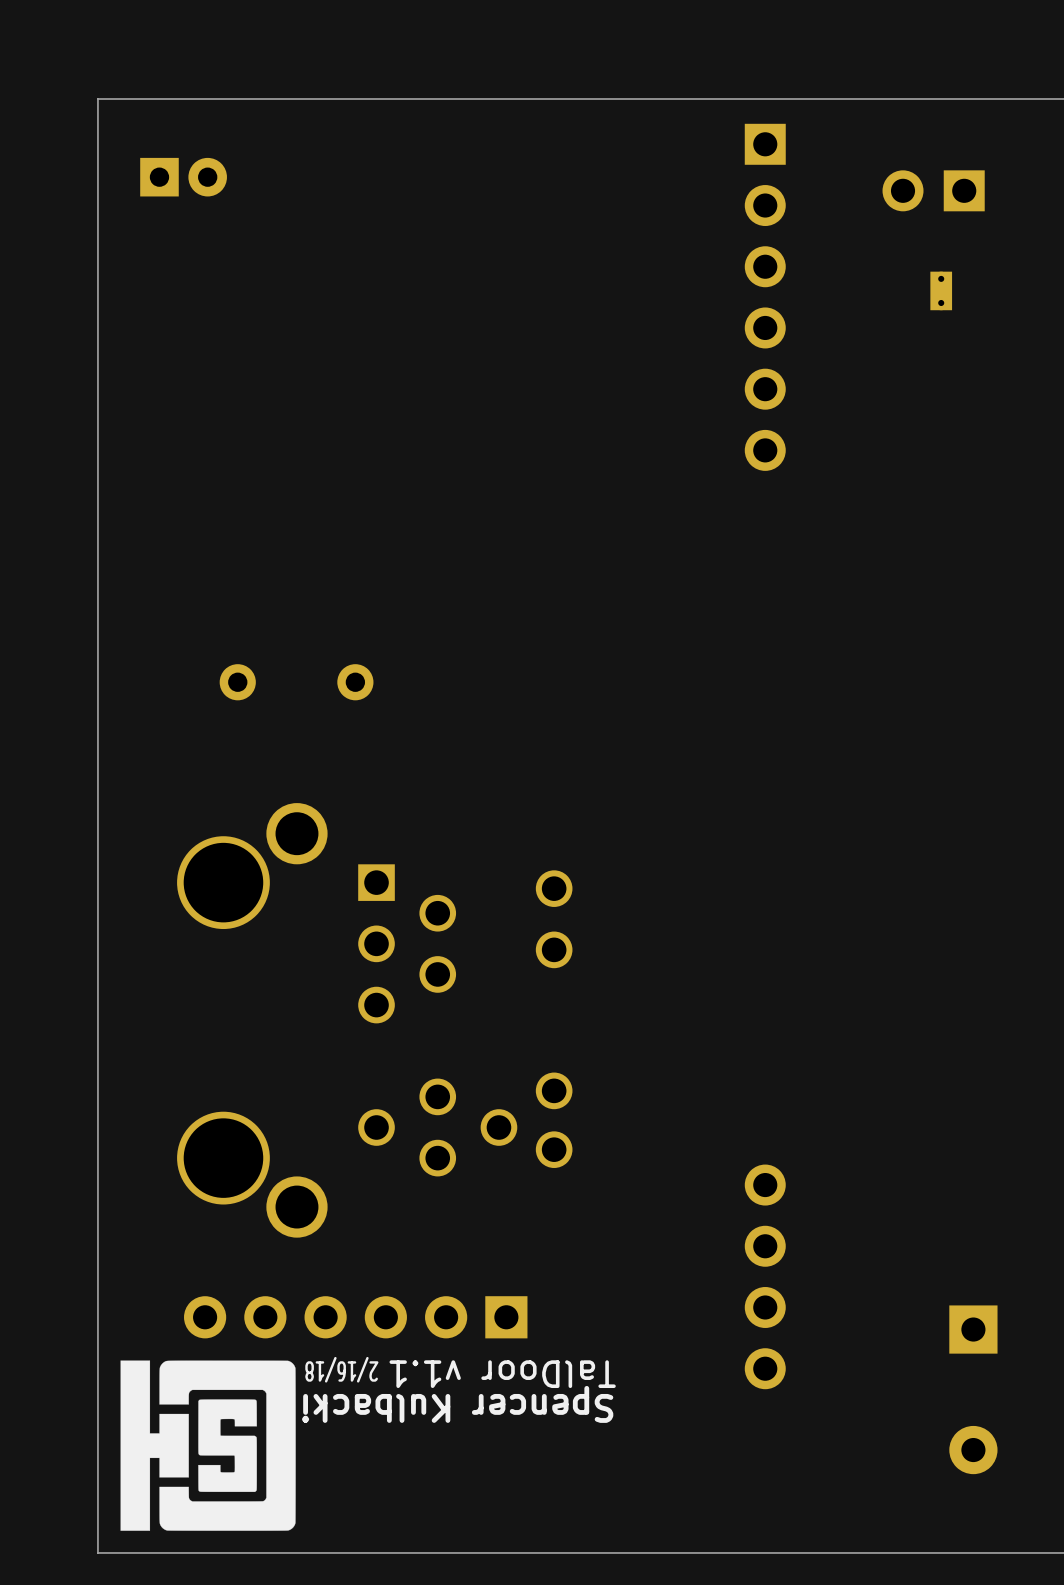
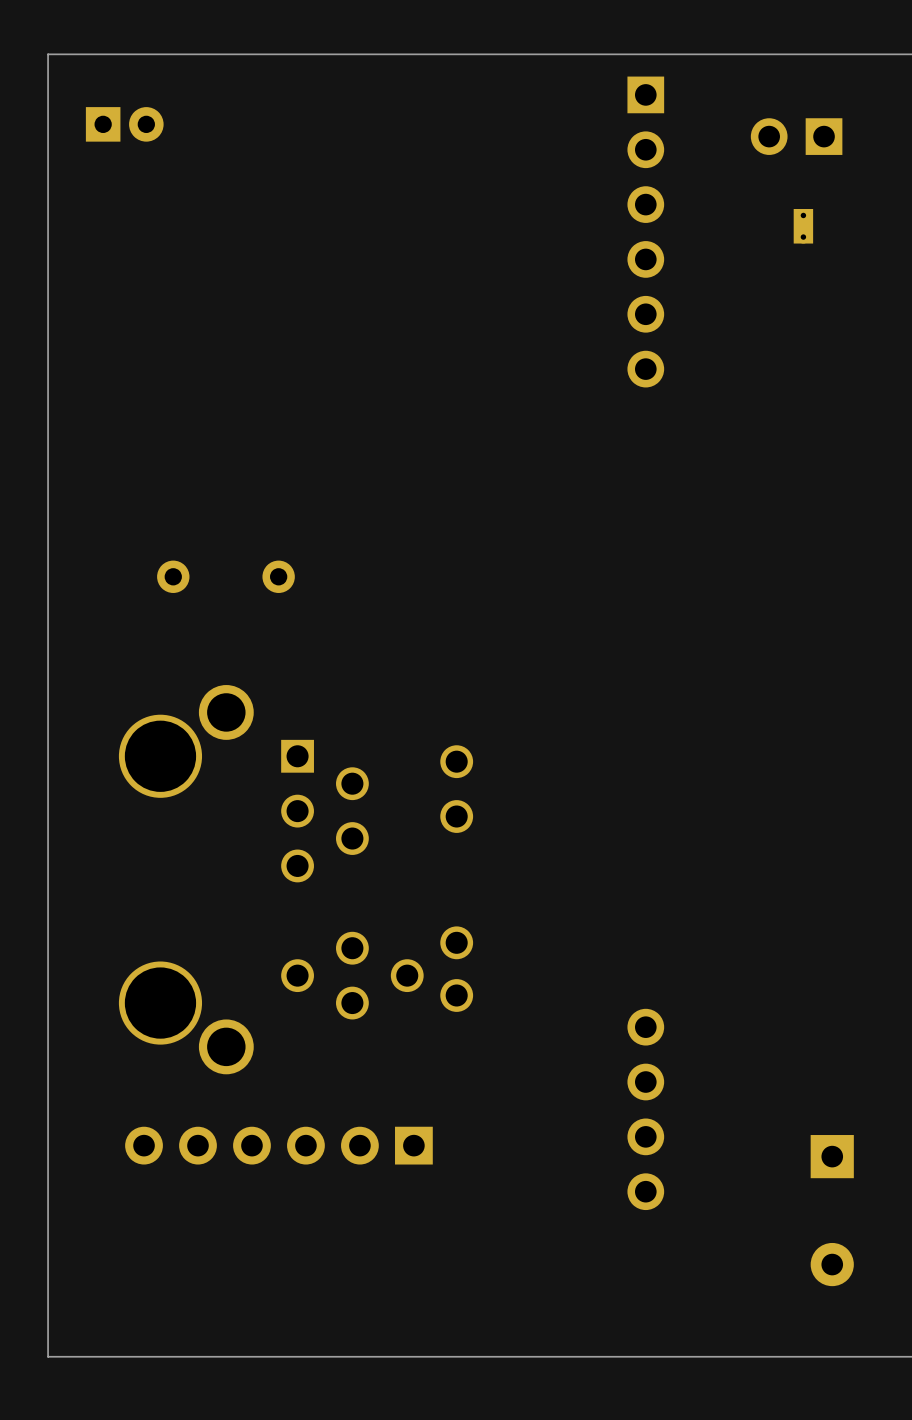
drawing: [120, 1360, 296, 1531] -> none
text: 2/16/18 (341, 1369) -> none
text: TalDoor v1.1 (502, 1374) -> none
text: Spencer Kulbacki (457, 1404) -> none

